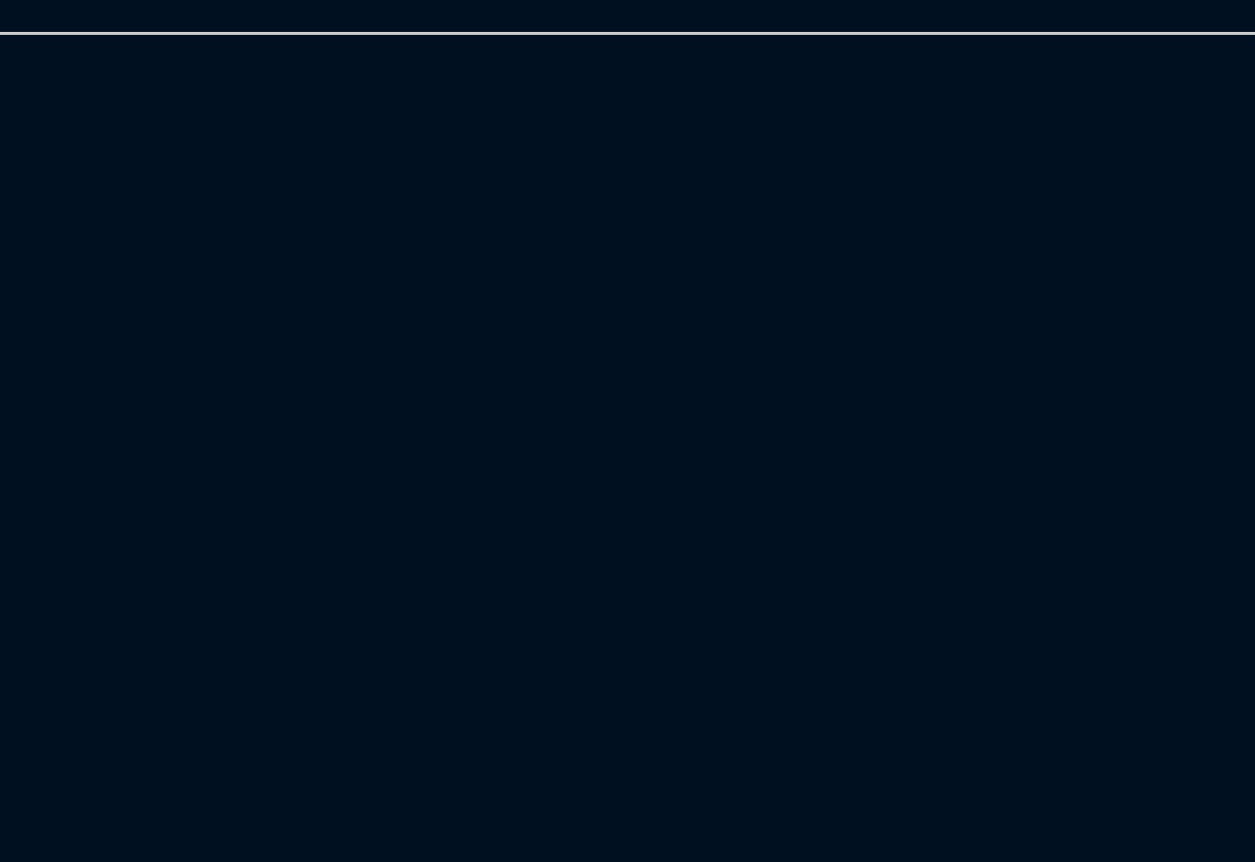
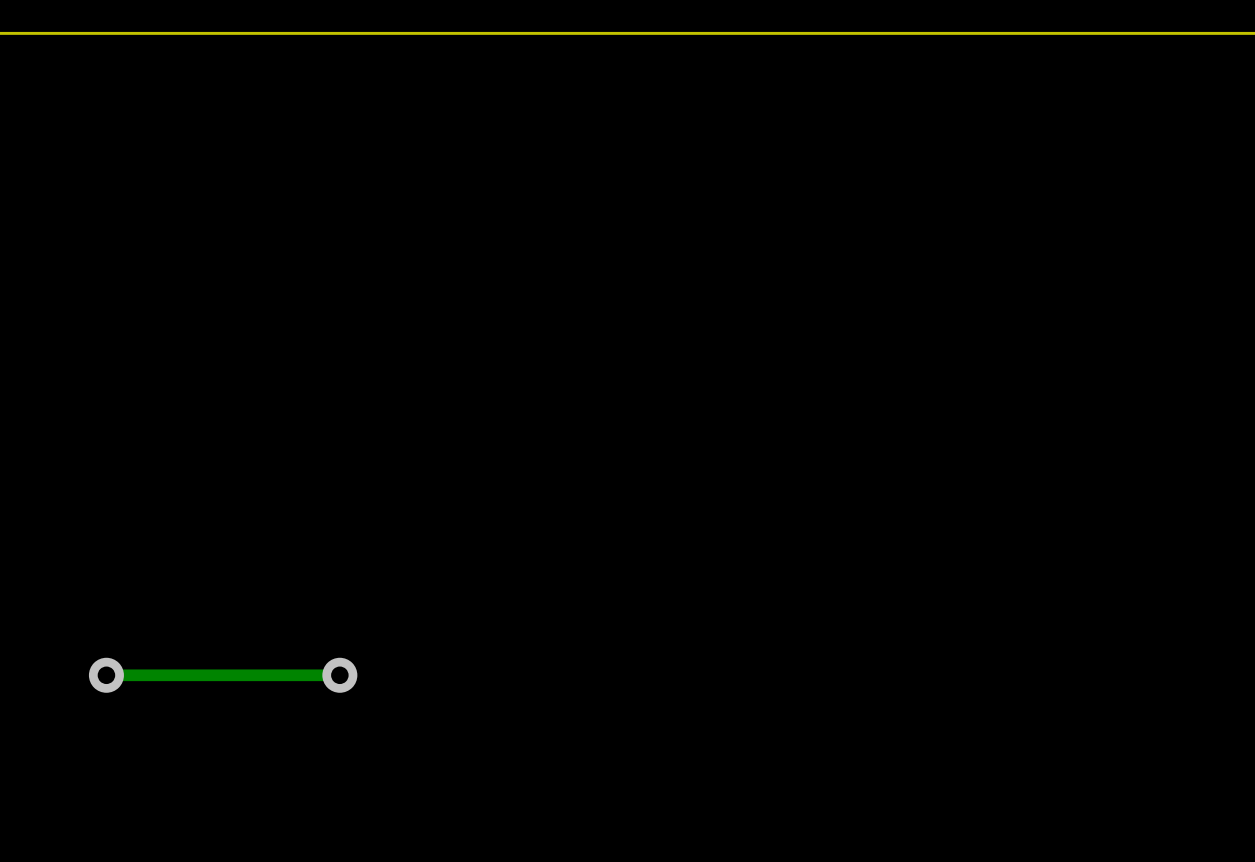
via: none -> (106, 675)
track: none -> (339, 675) (106, 675)
via: none -> (339, 675)

